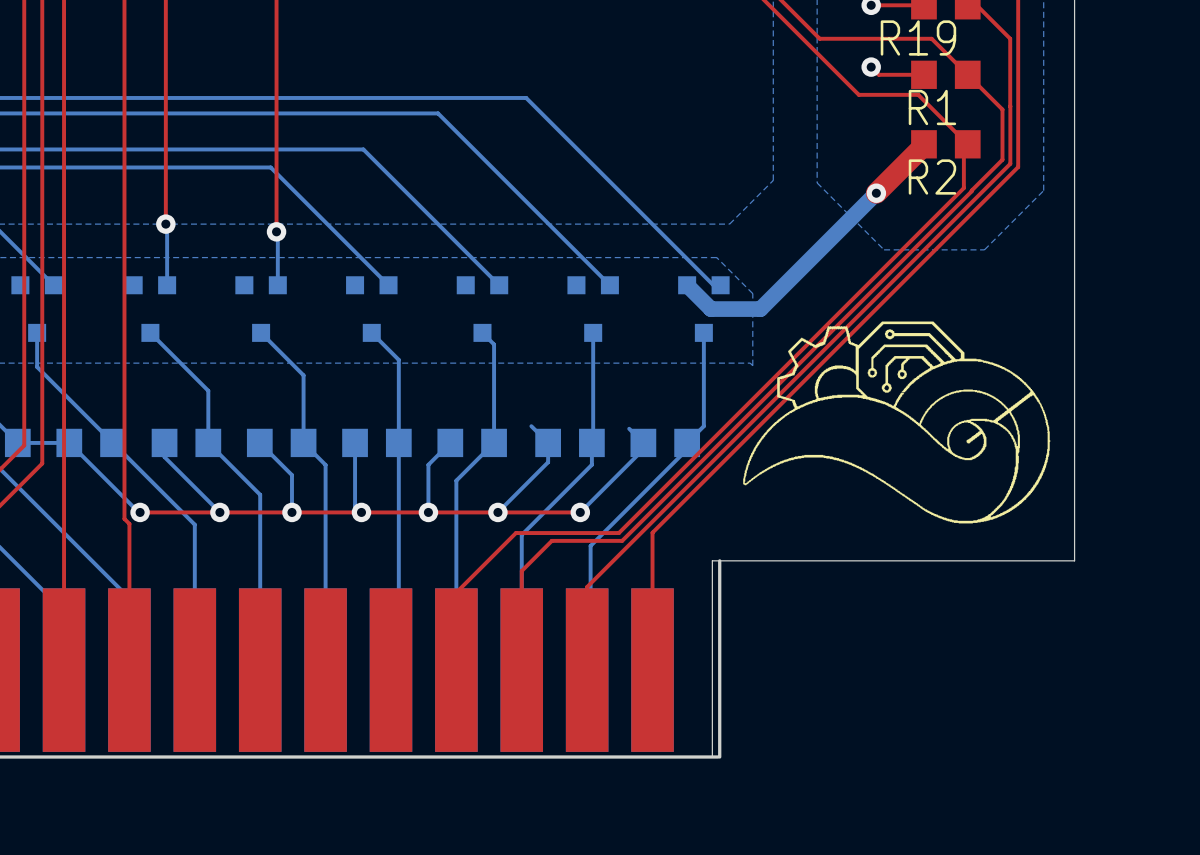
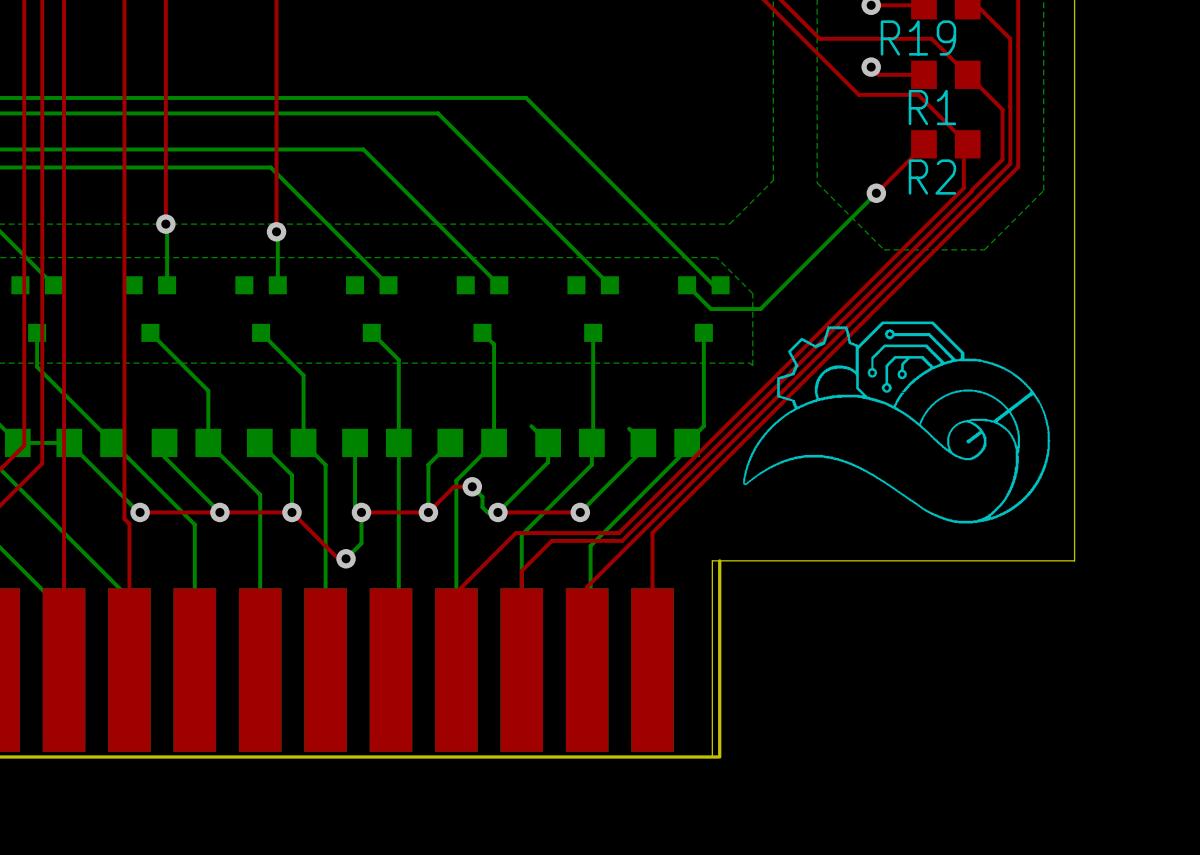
top track width: thick (923, 145) (876, 193) -> thin (923, 145) (876, 193)
bottom track width: thick (876, 193) (760, 309) (710, 309) (687, 285) -> thin (876, 193) (760, 309) (710, 309) (687, 285)
bottom track: none -> (472, 486) (482, 496) (482, 507) (487, 512) (497, 512)
via: none -> (472, 486)
top track: (291, 512) (361, 512) -> (291, 512) (338, 558) (346, 558)
bottom track: none -> (361, 512) (361, 543) (346, 558)
top track: (428, 512) (497, 512) -> (428, 512) (454, 486) (472, 486)
via: none -> (346, 558)

